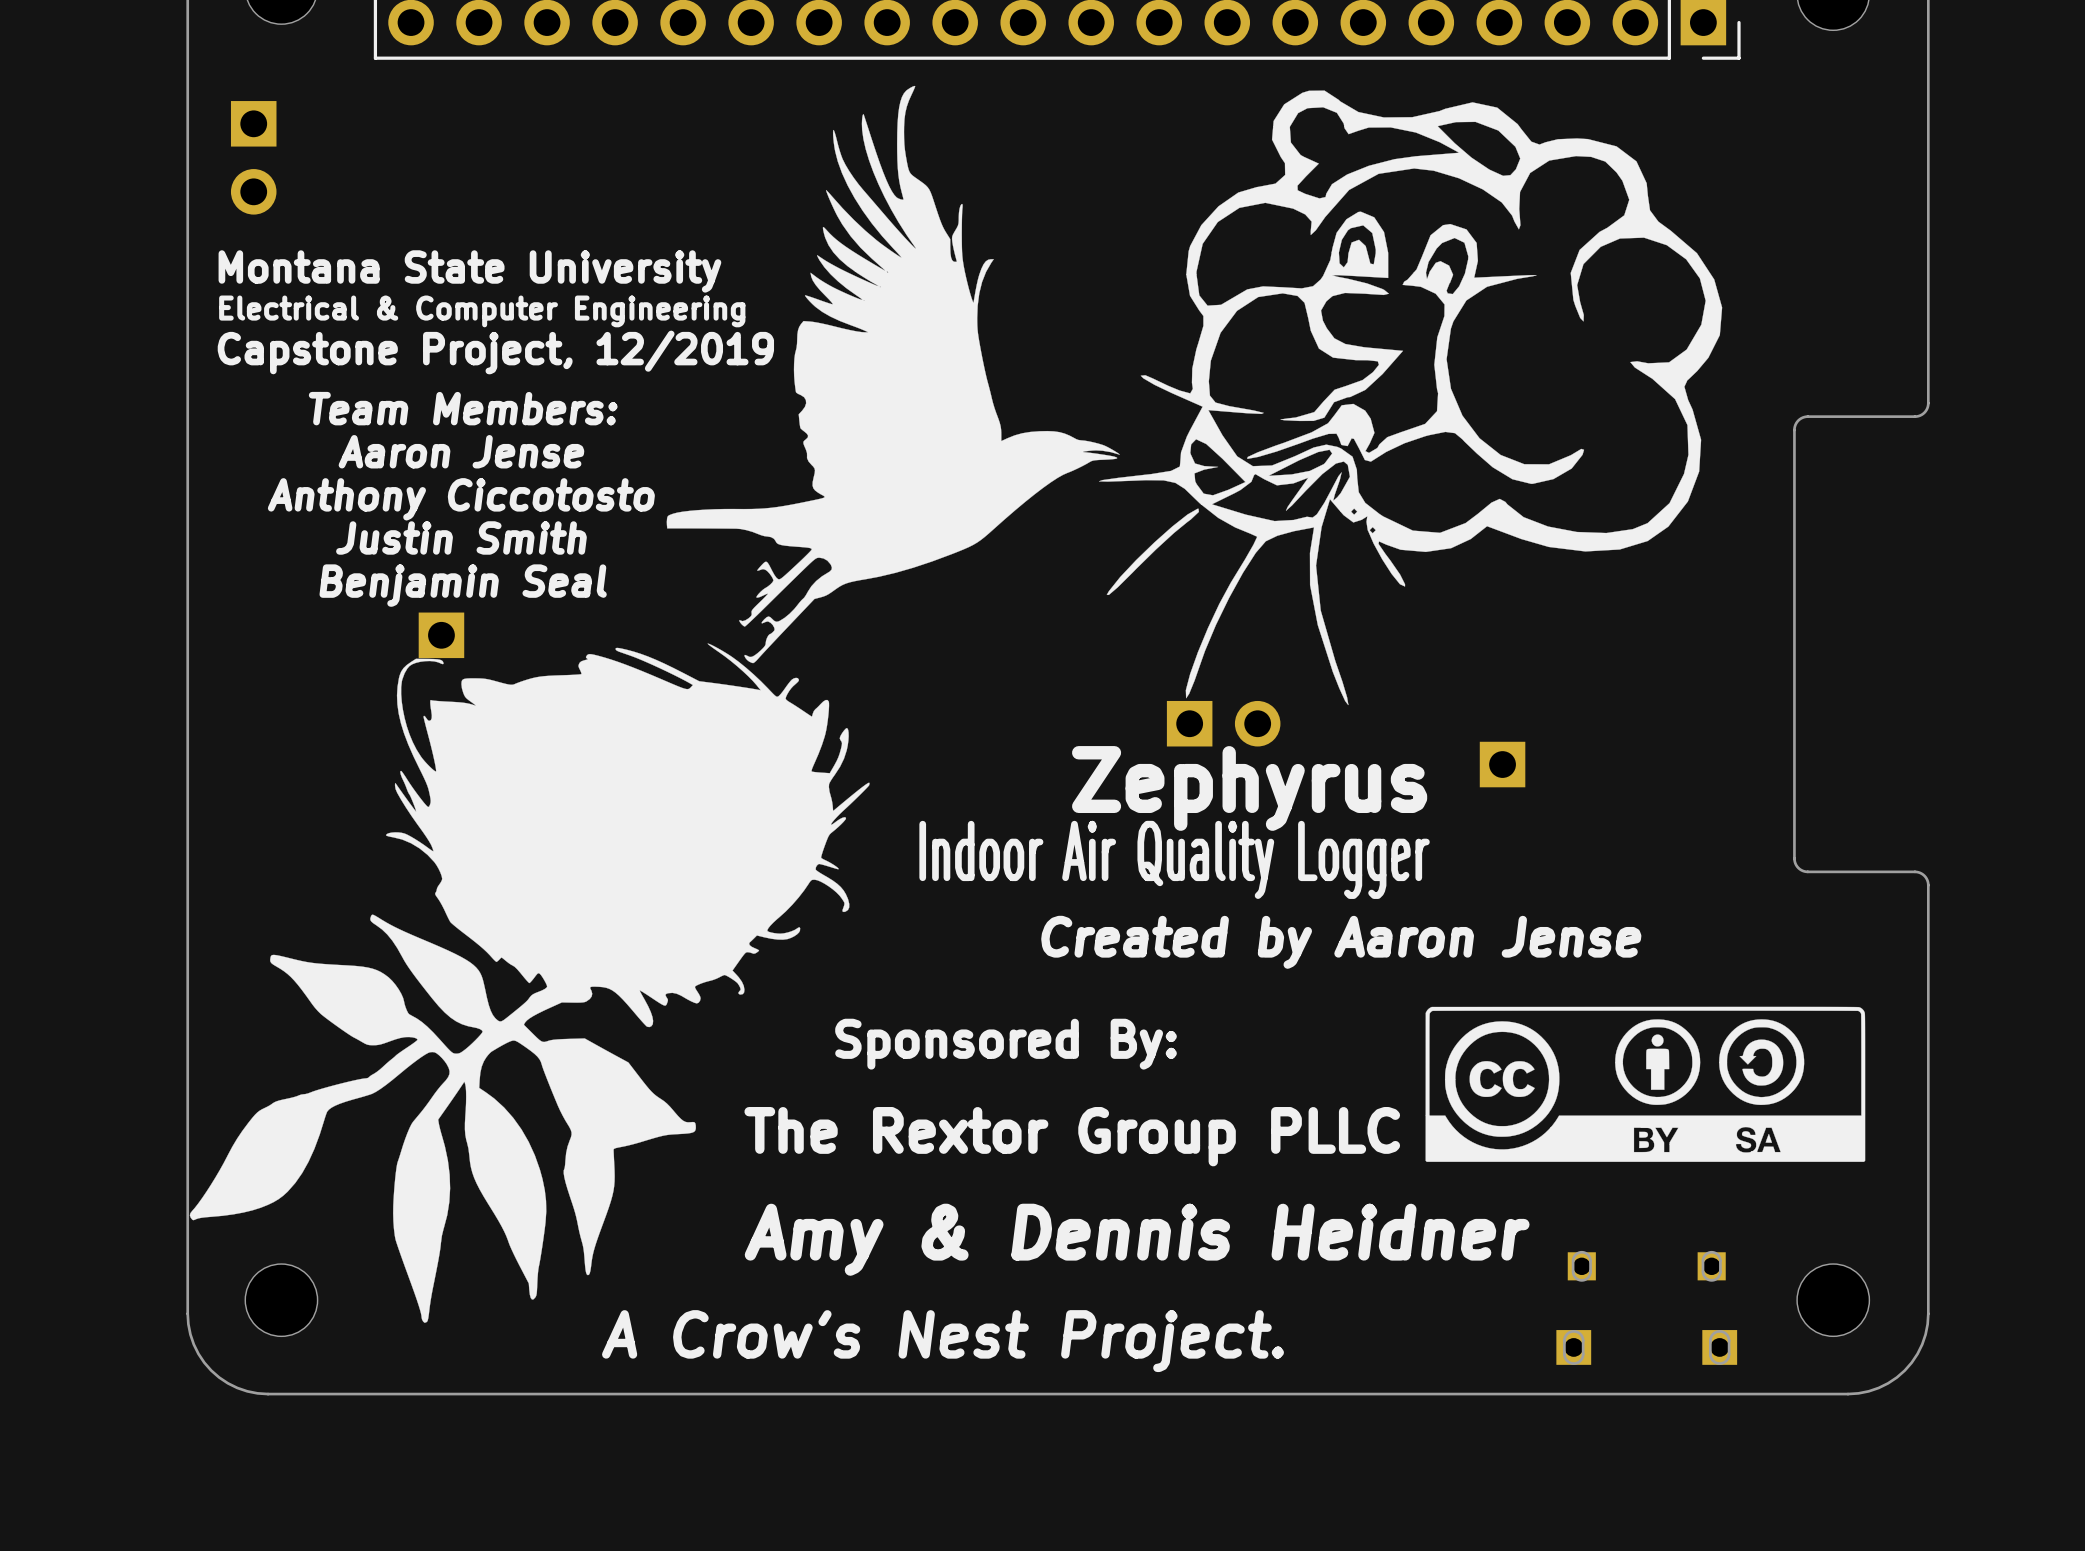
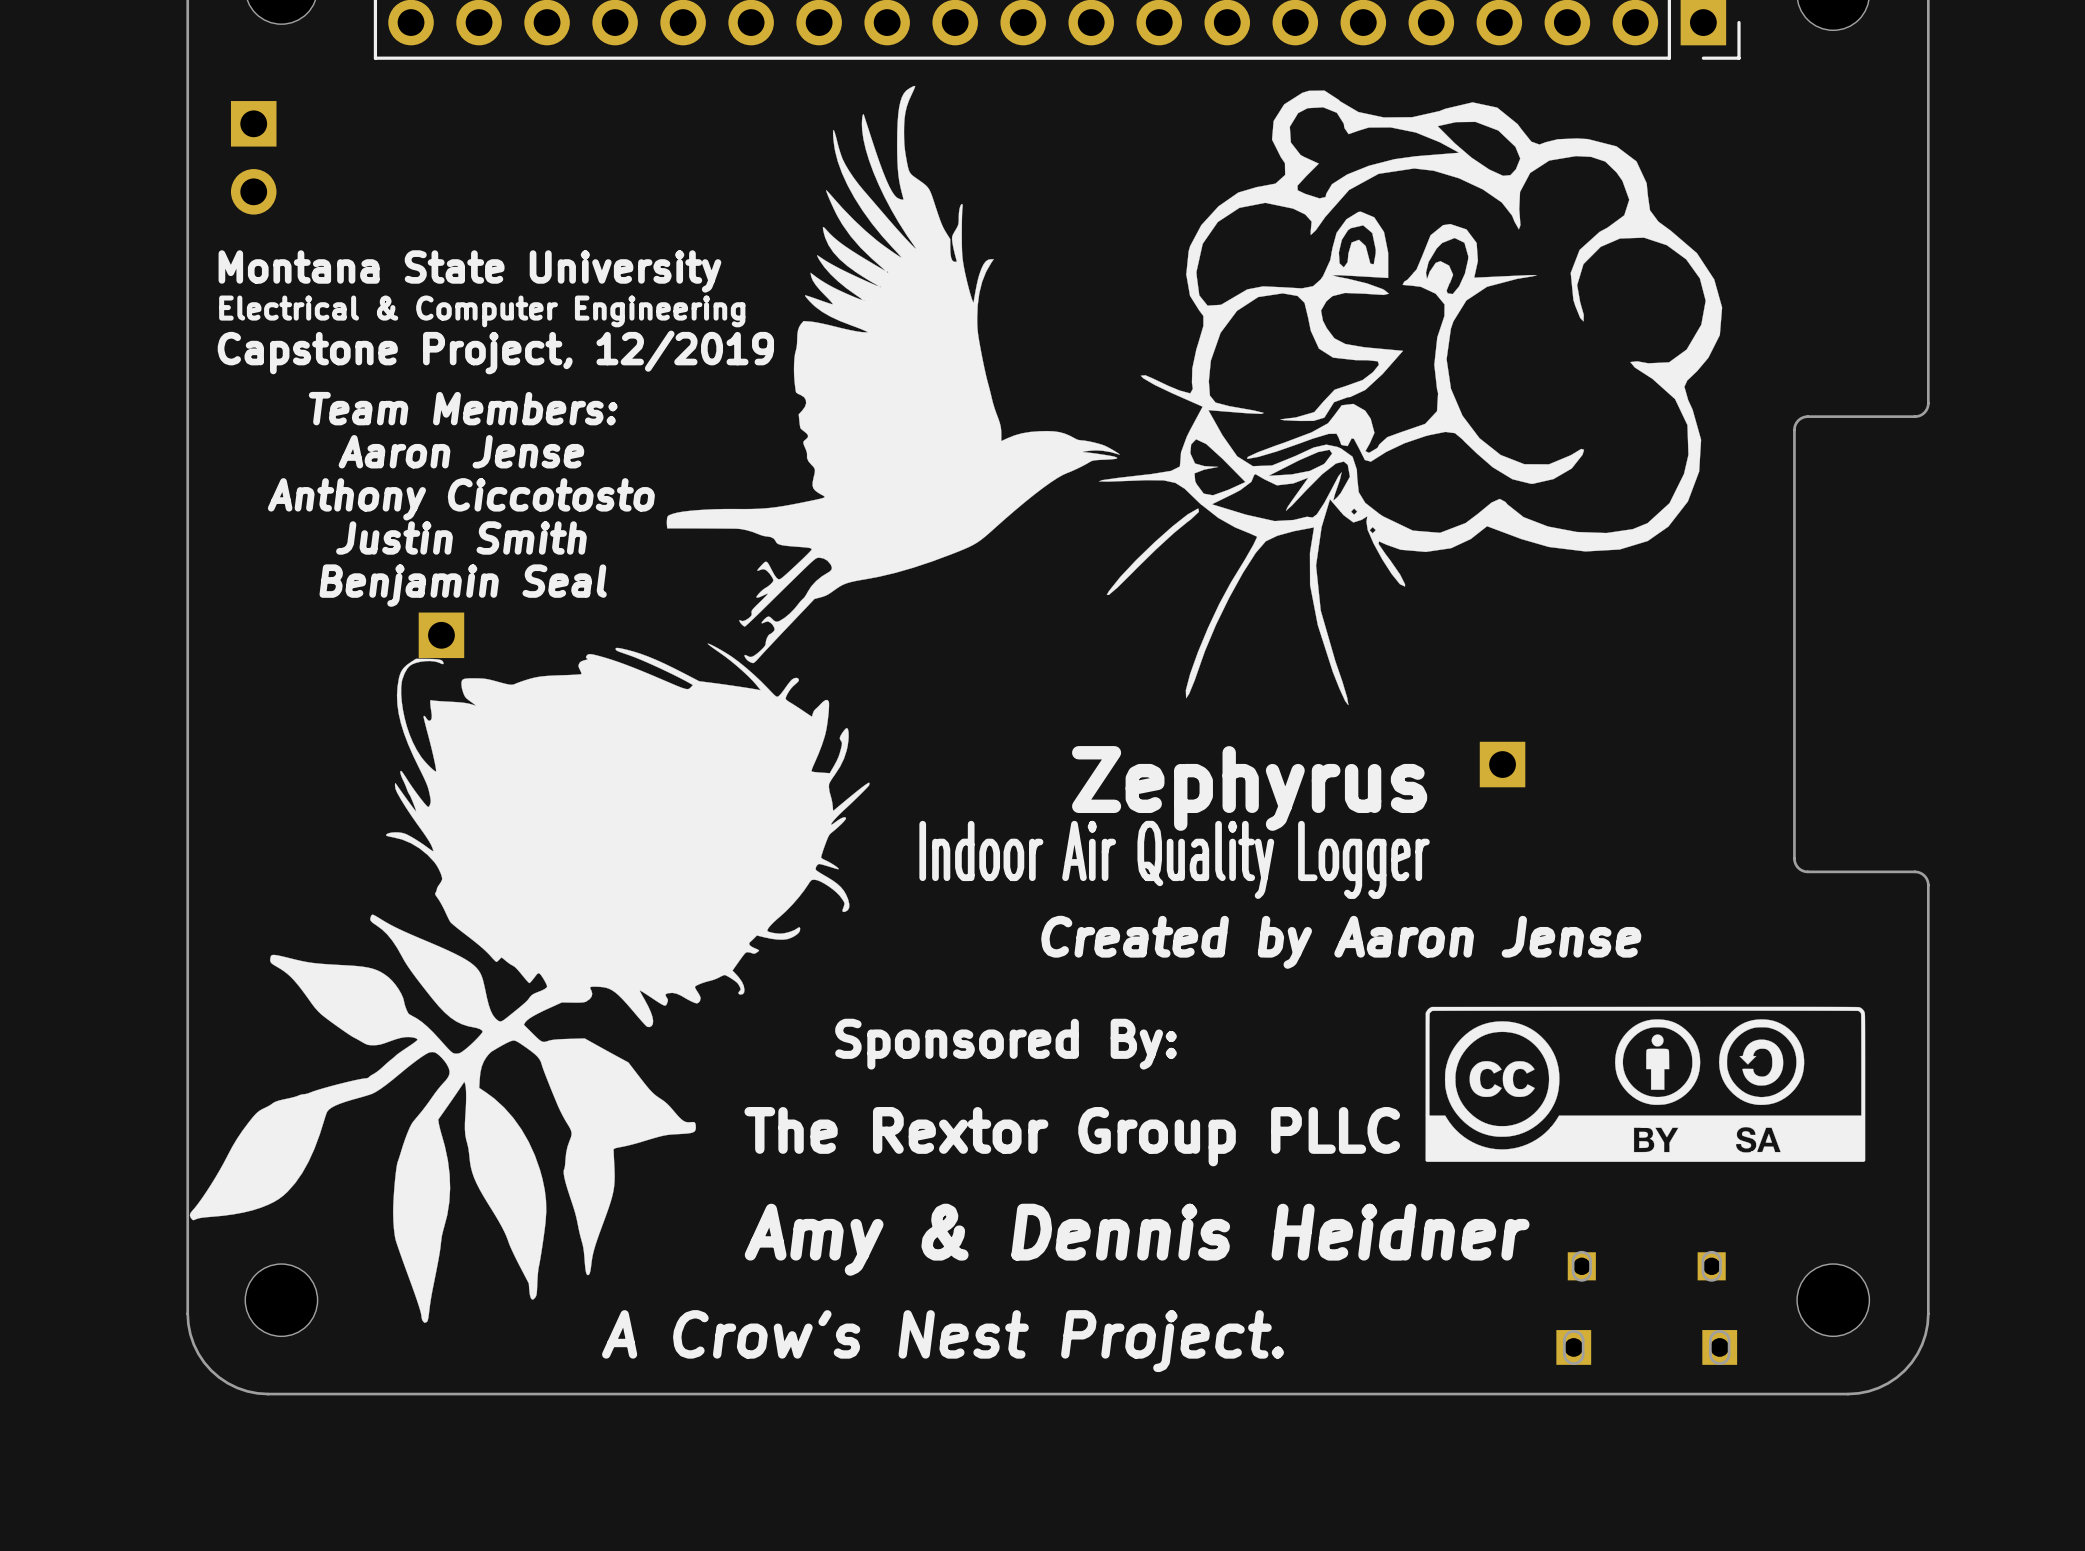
part: (1223, 723) -> none

